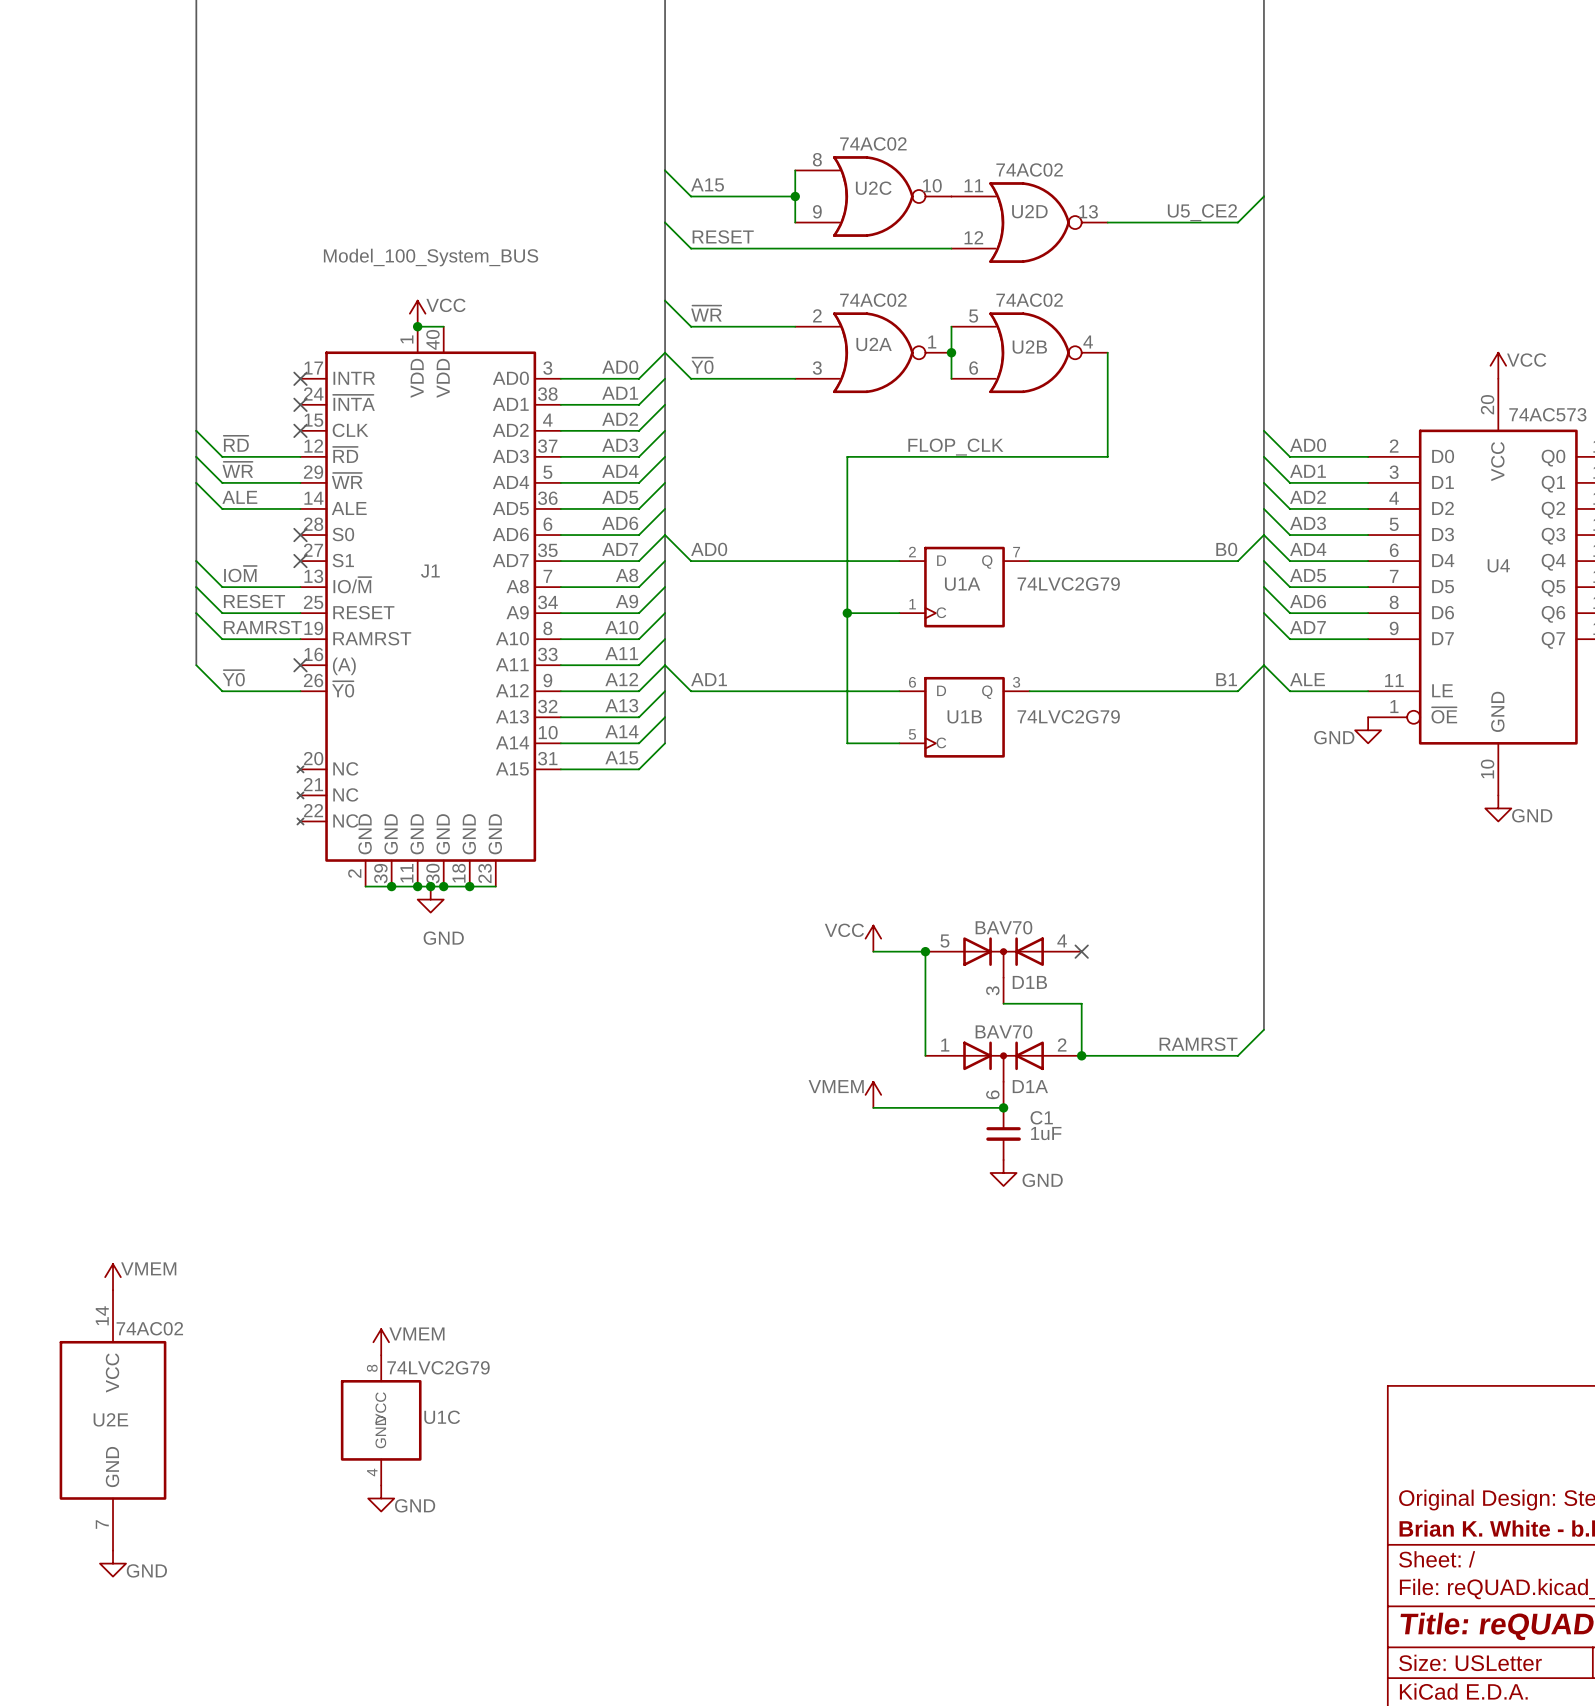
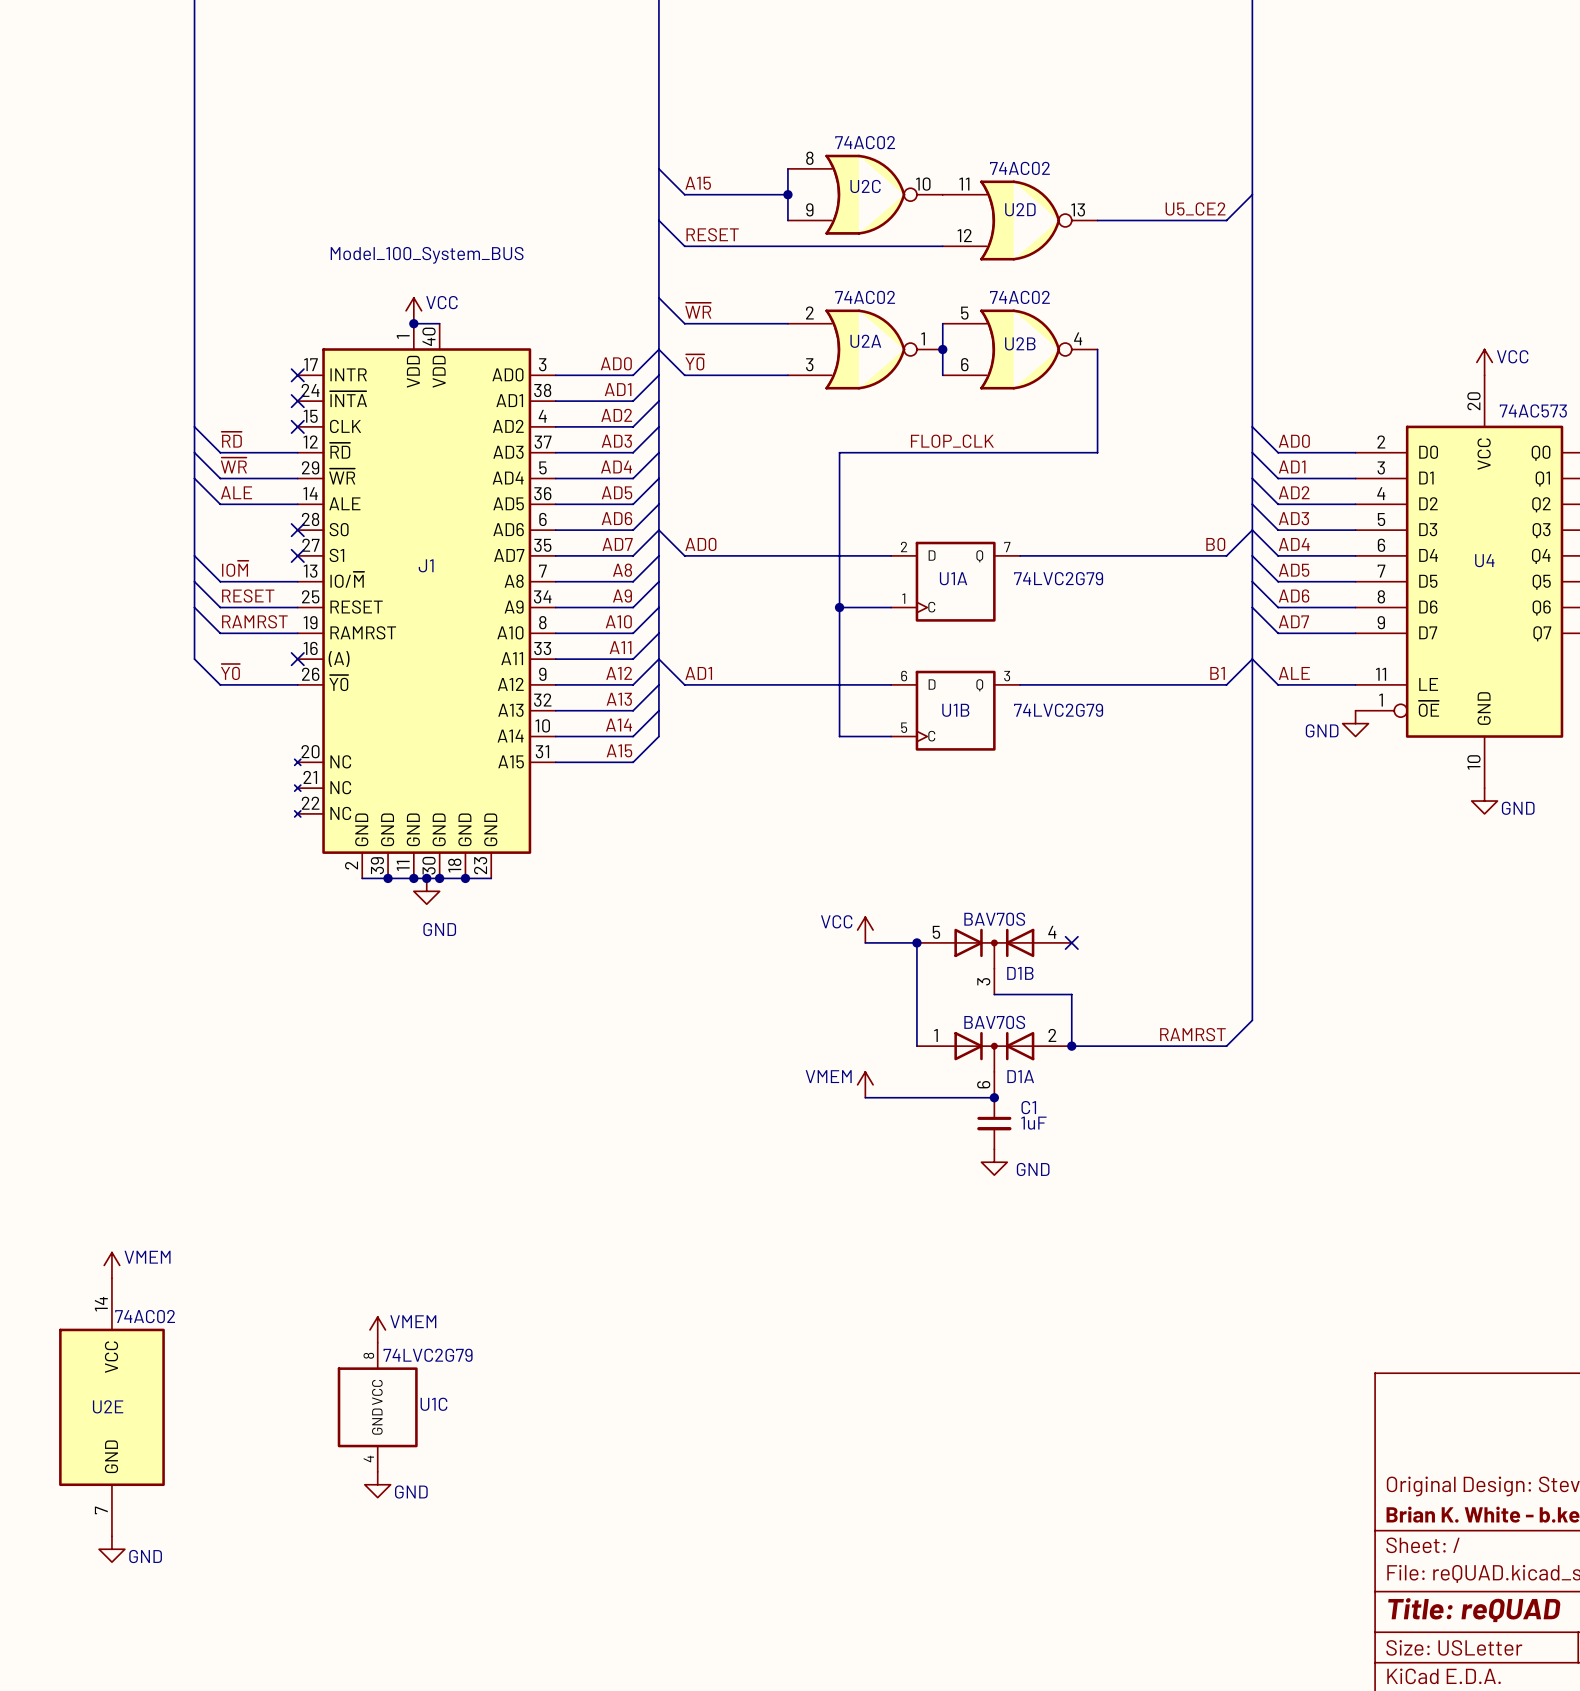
D1B value: BAV70 (1003, 927) -> BAV70S (994, 919)
D1A value: BAV70 (1003, 1031) -> BAV70S (994, 1022)

